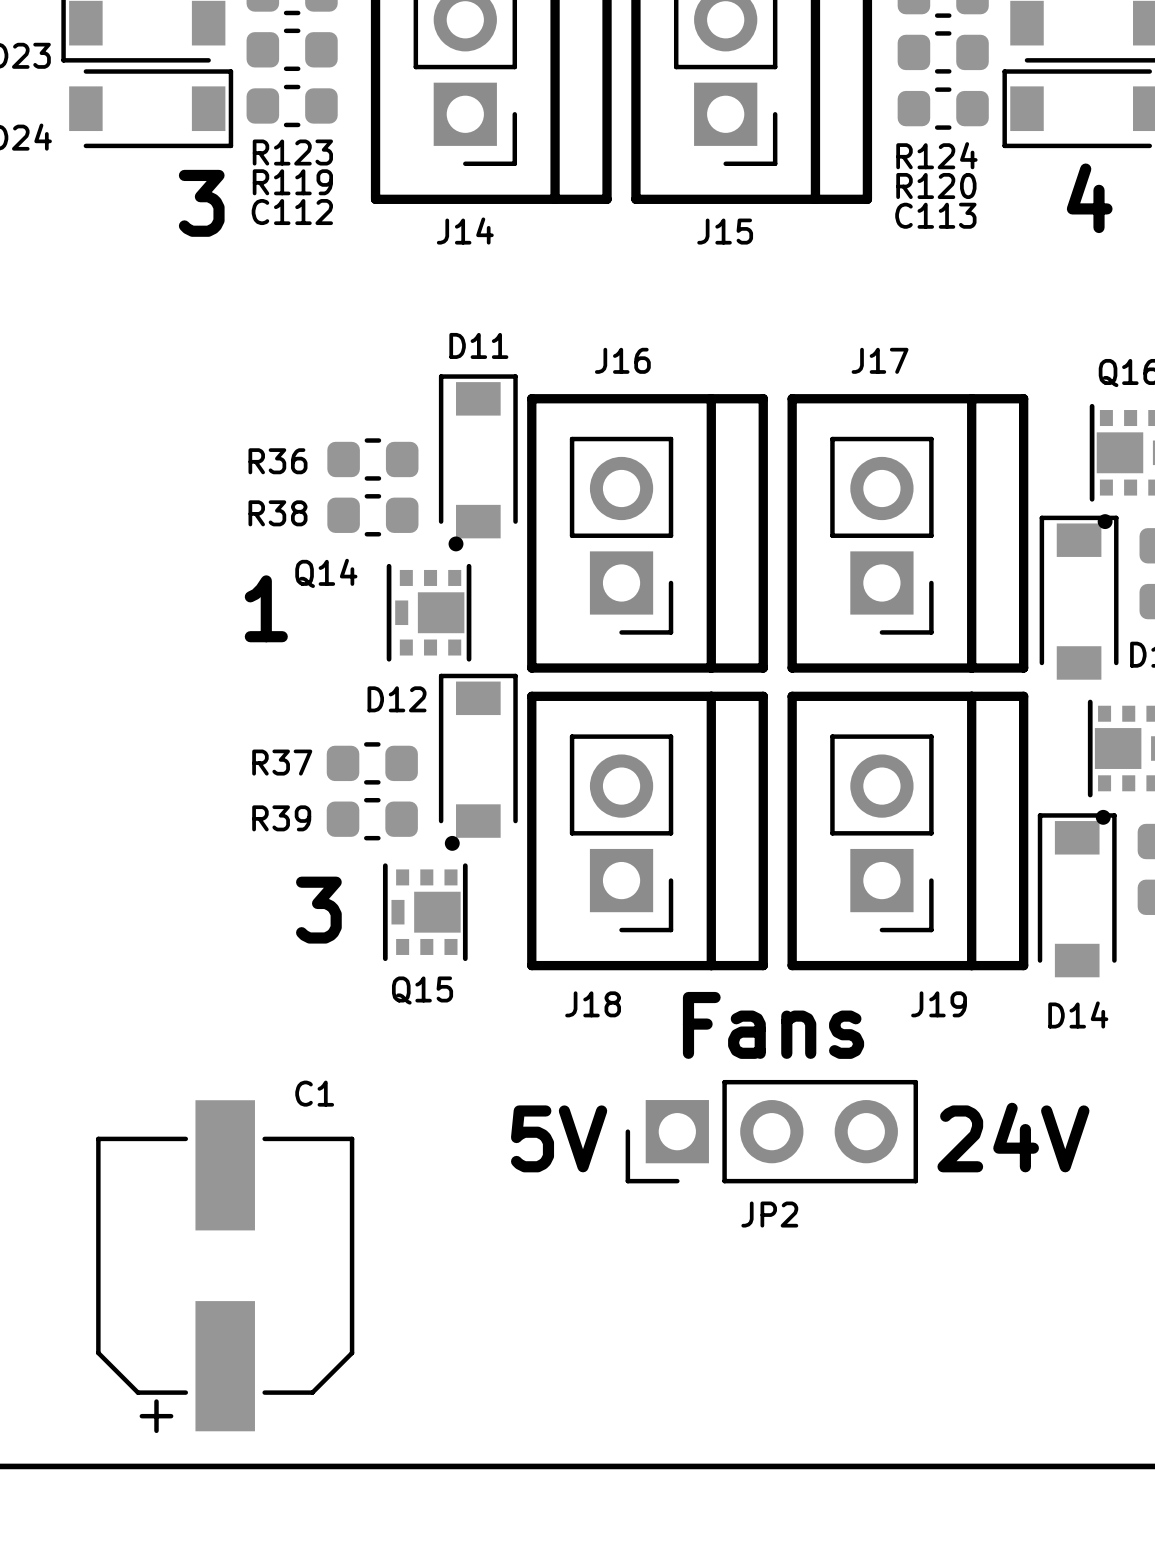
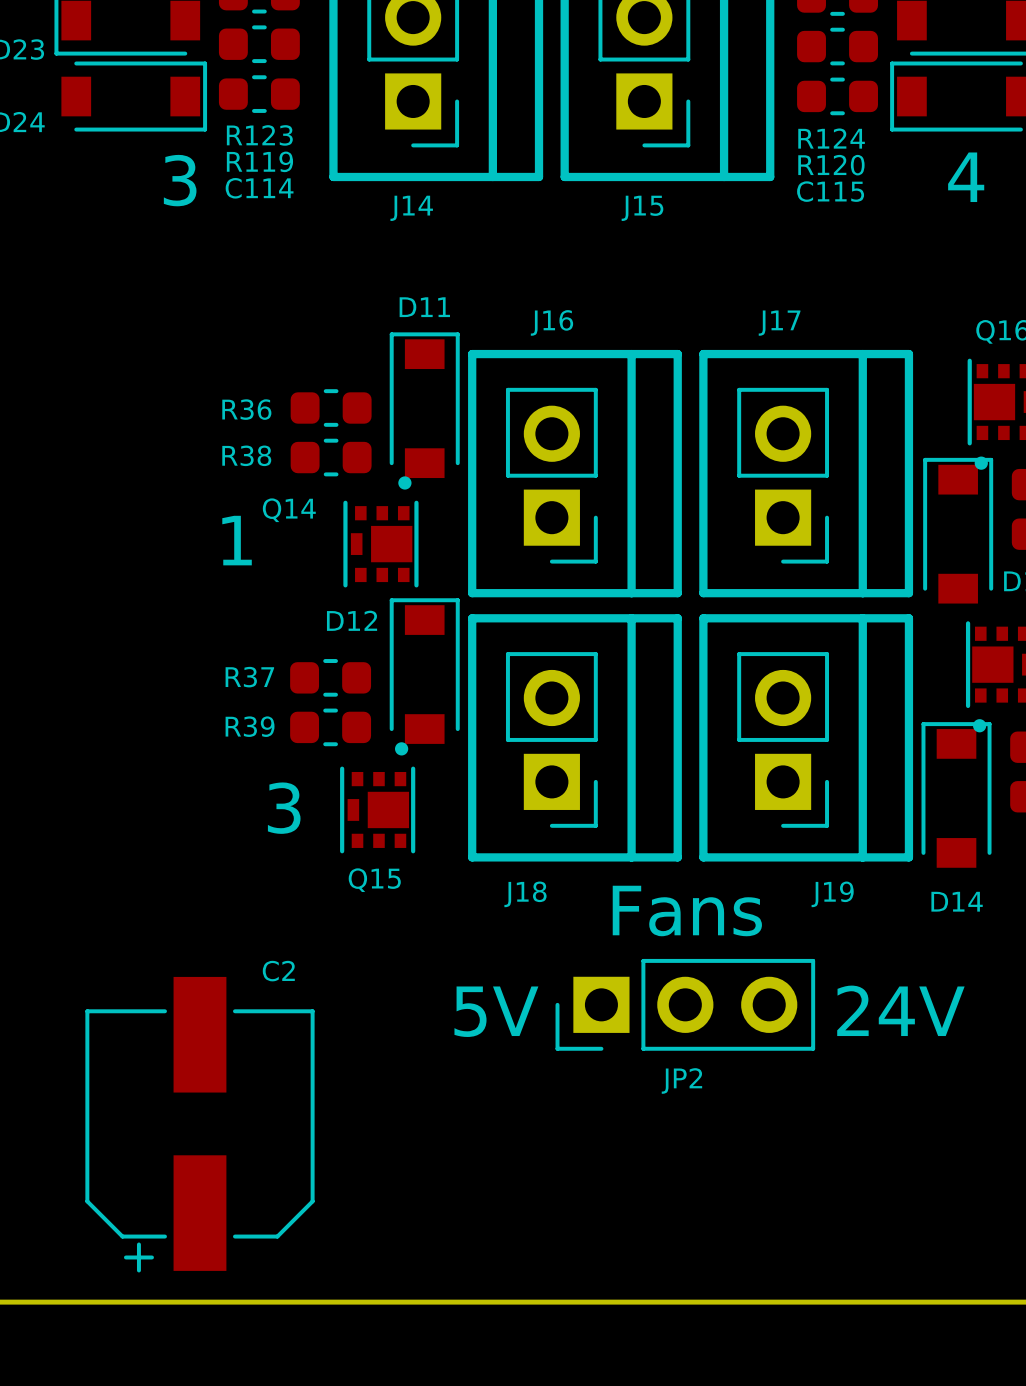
C112 name: C112 (292, 212) -> C114 (259, 188)
C113 name: C113 (935, 215) -> C115 (830, 191)
C1 name: C1 (314, 1093) -> C2 (278, 971)

